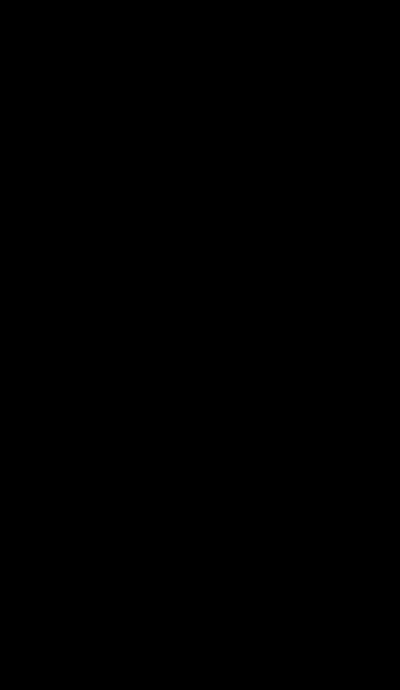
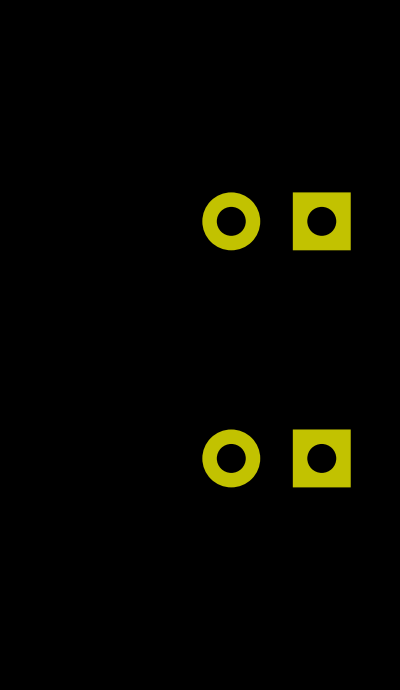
part: none -> (276, 221)
part: none -> (276, 458)

